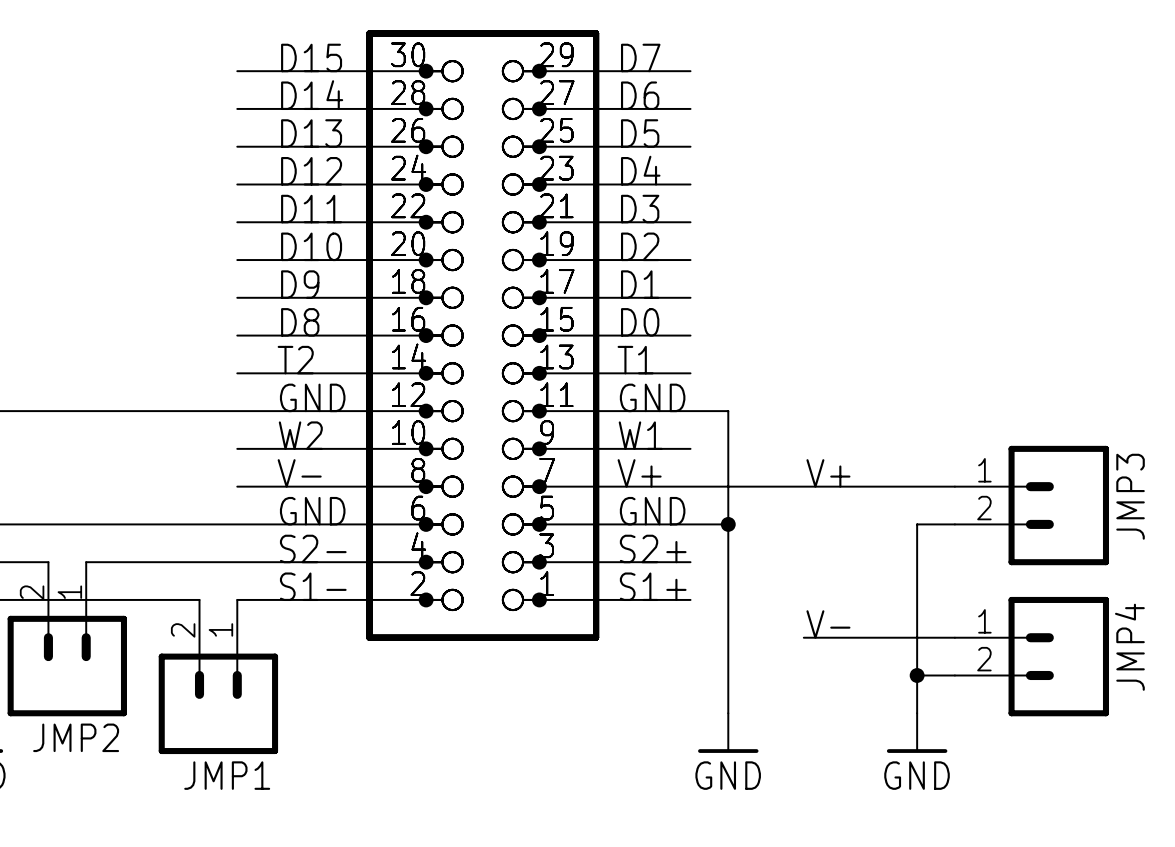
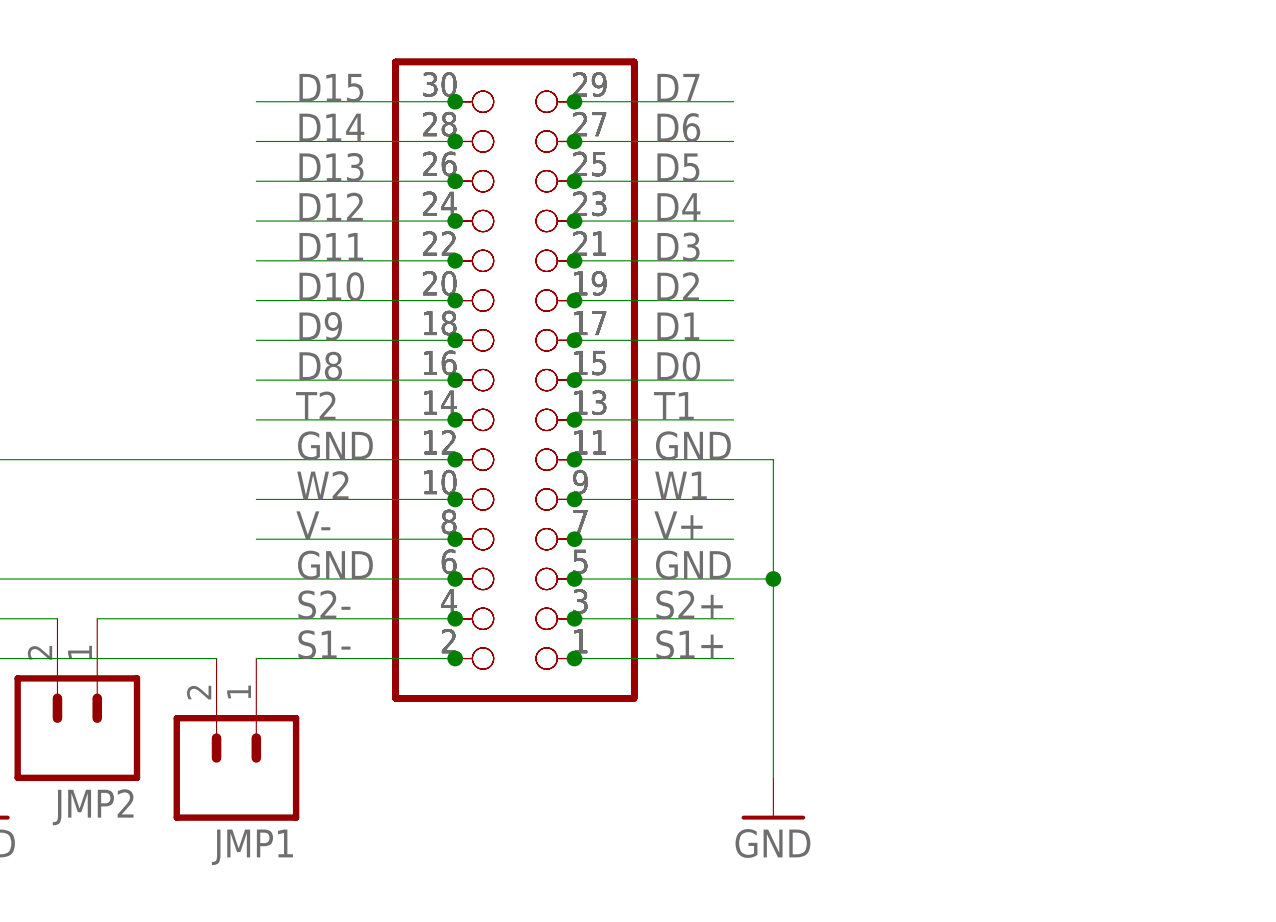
label: V+ (828, 473) -> none
wire: (690, 486) (954, 486) -> none
JMP3: (1031, 505) -> none
wire: (954, 524) (917, 524) (917, 713) -> none
label: V- (828, 624) -> none
wire: (803, 637) (954, 637) -> none
JMP4: (1031, 656) -> none
wire: (917, 675) (954, 675) -> none
junction: (917, 675) -> none
power symbol: GND (917, 733) -> none

